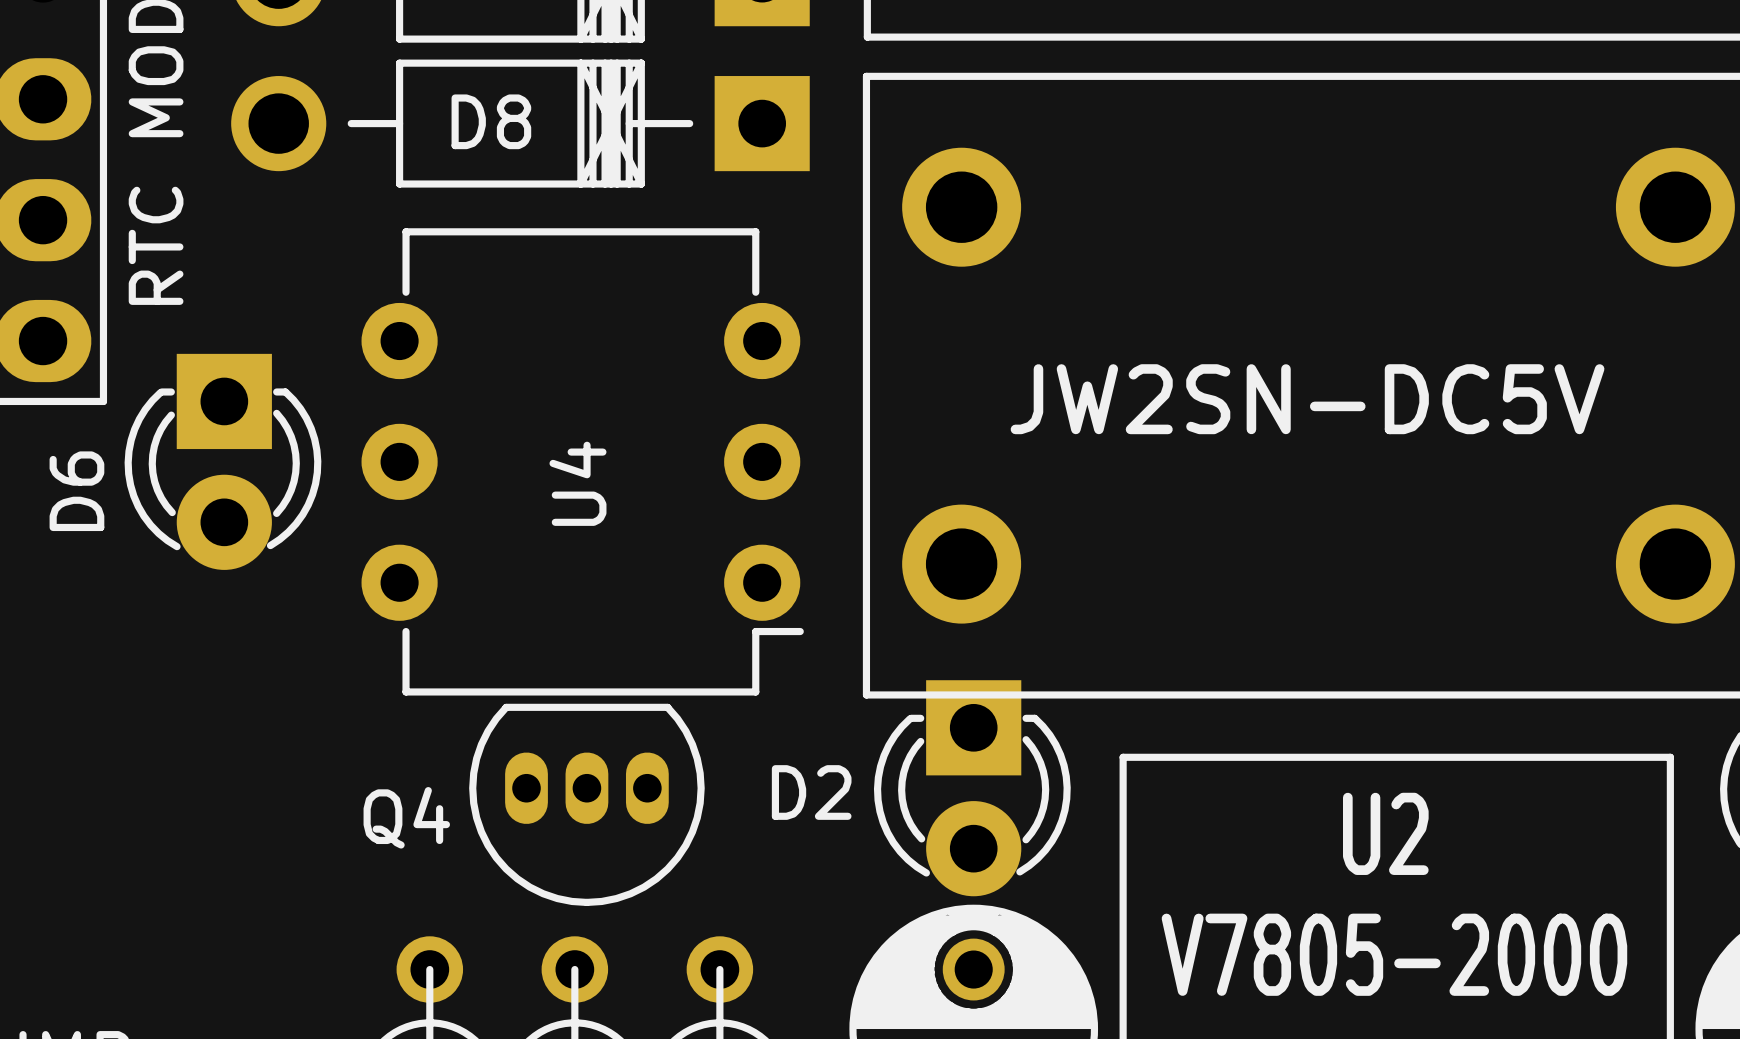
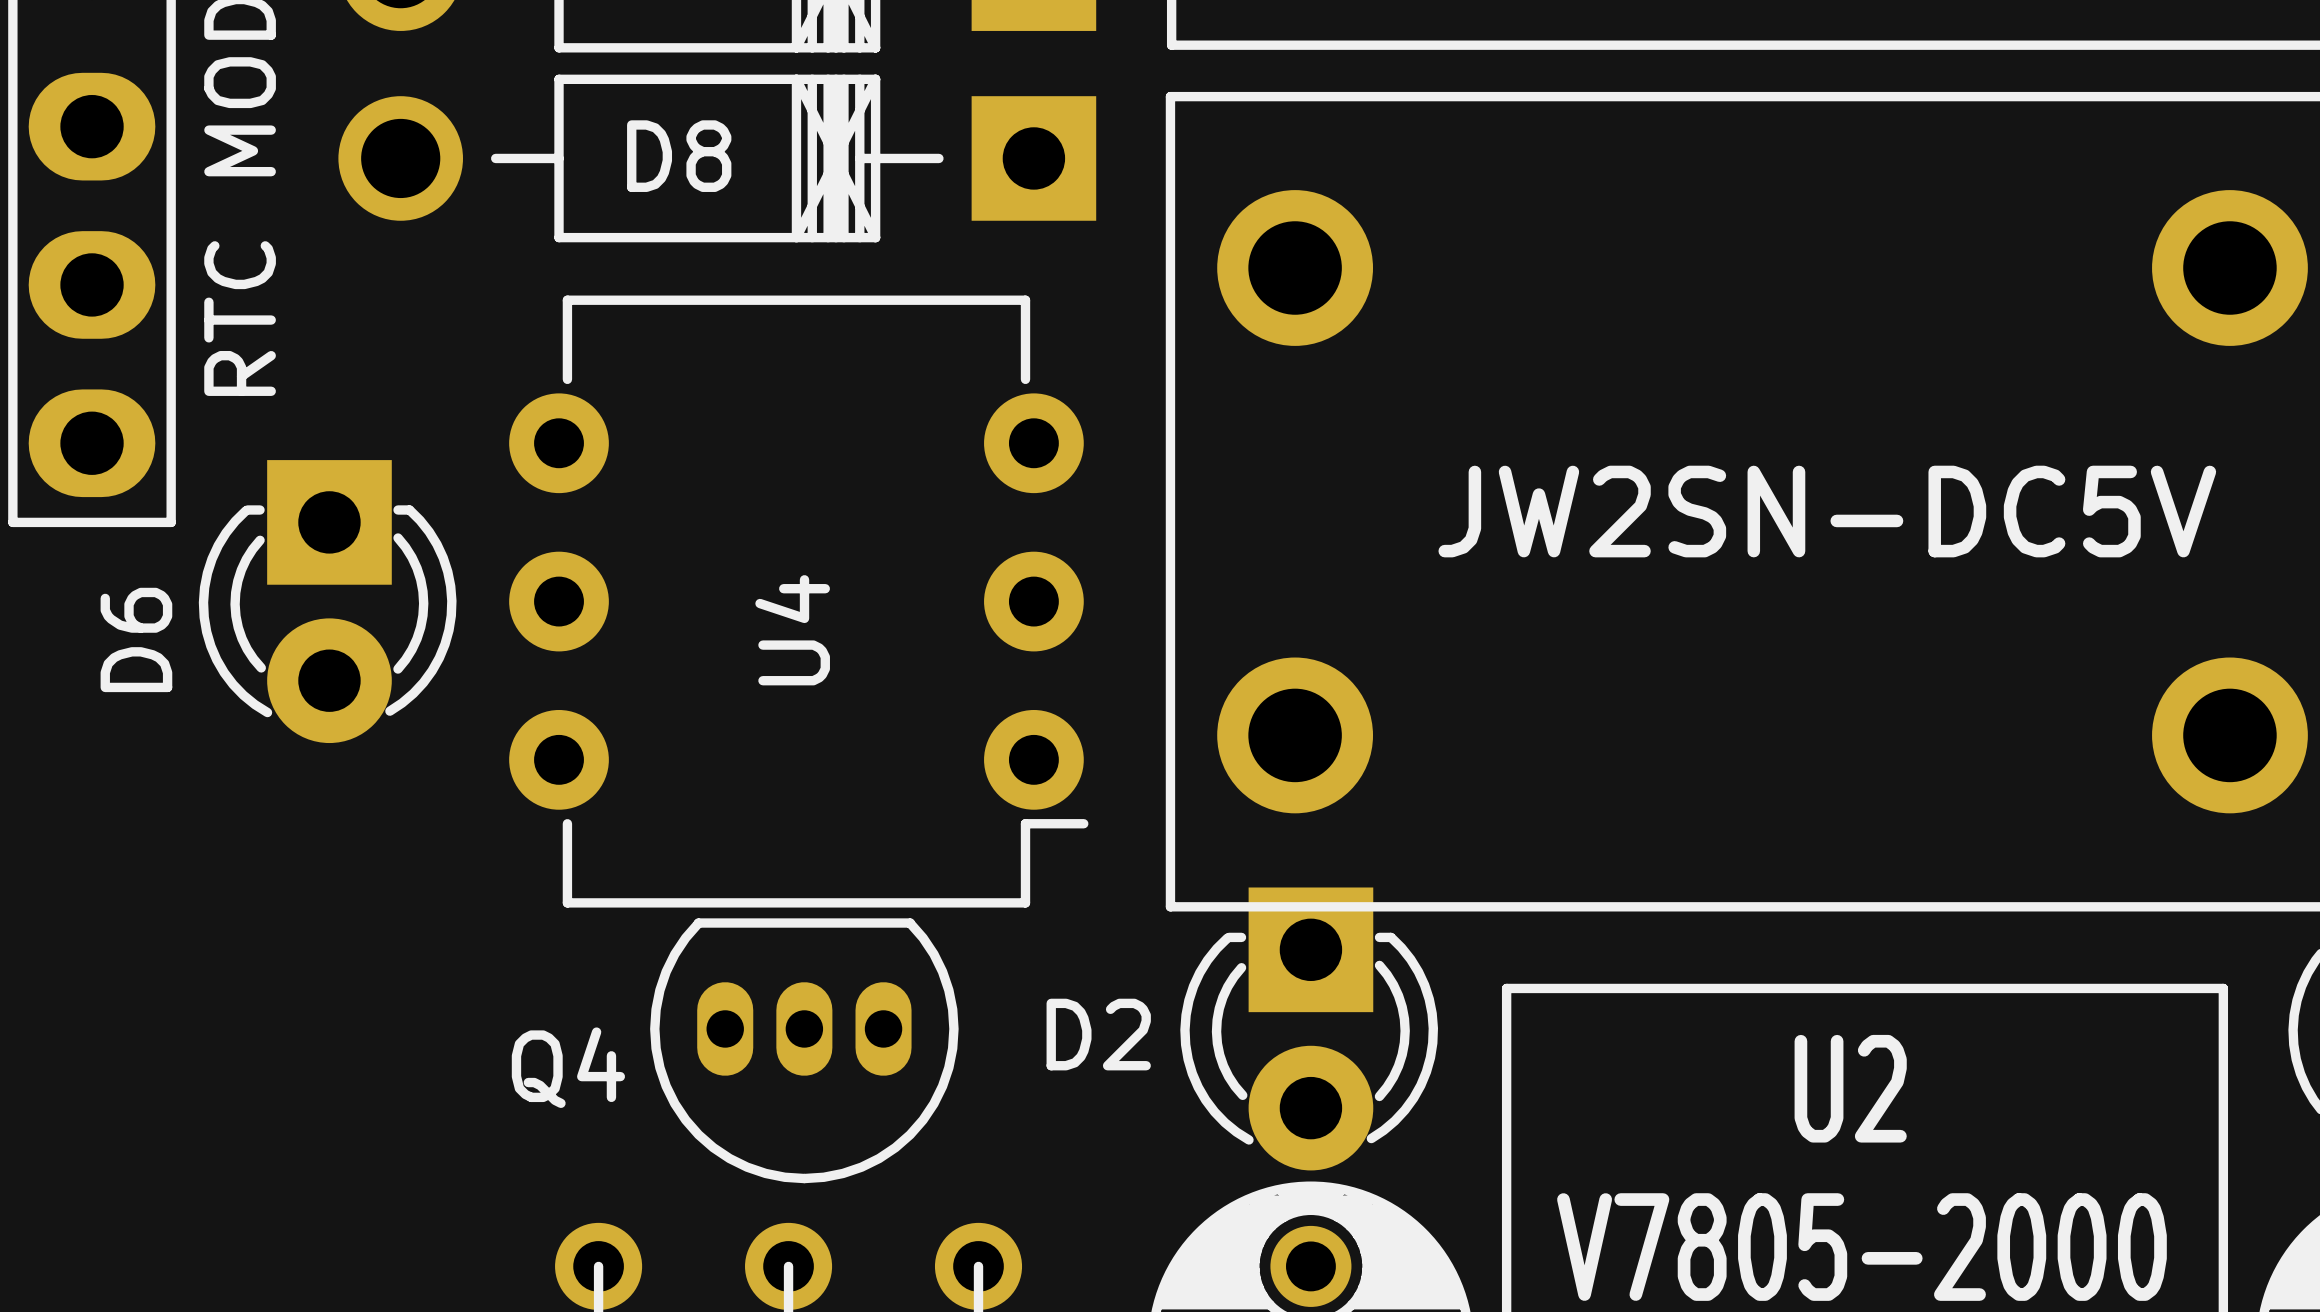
part value position: JW2SN-DC5V (1307, 399) -> JW2SN-DC5V (1827, 511)

